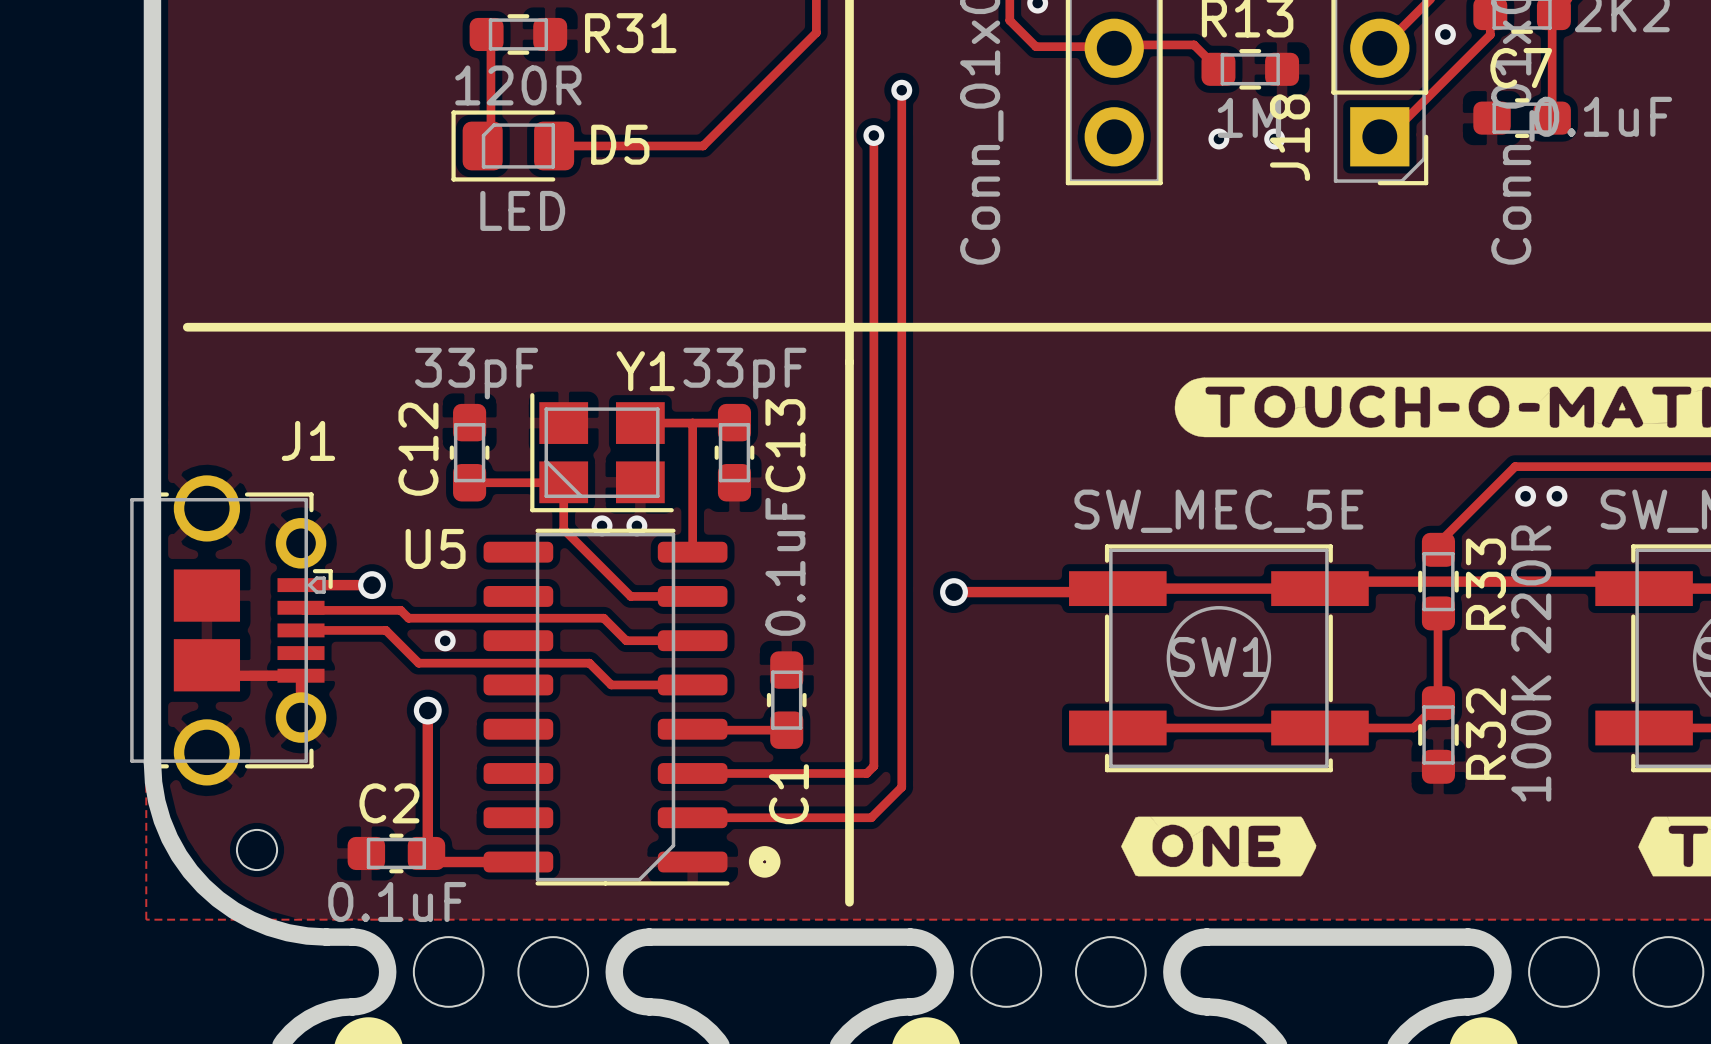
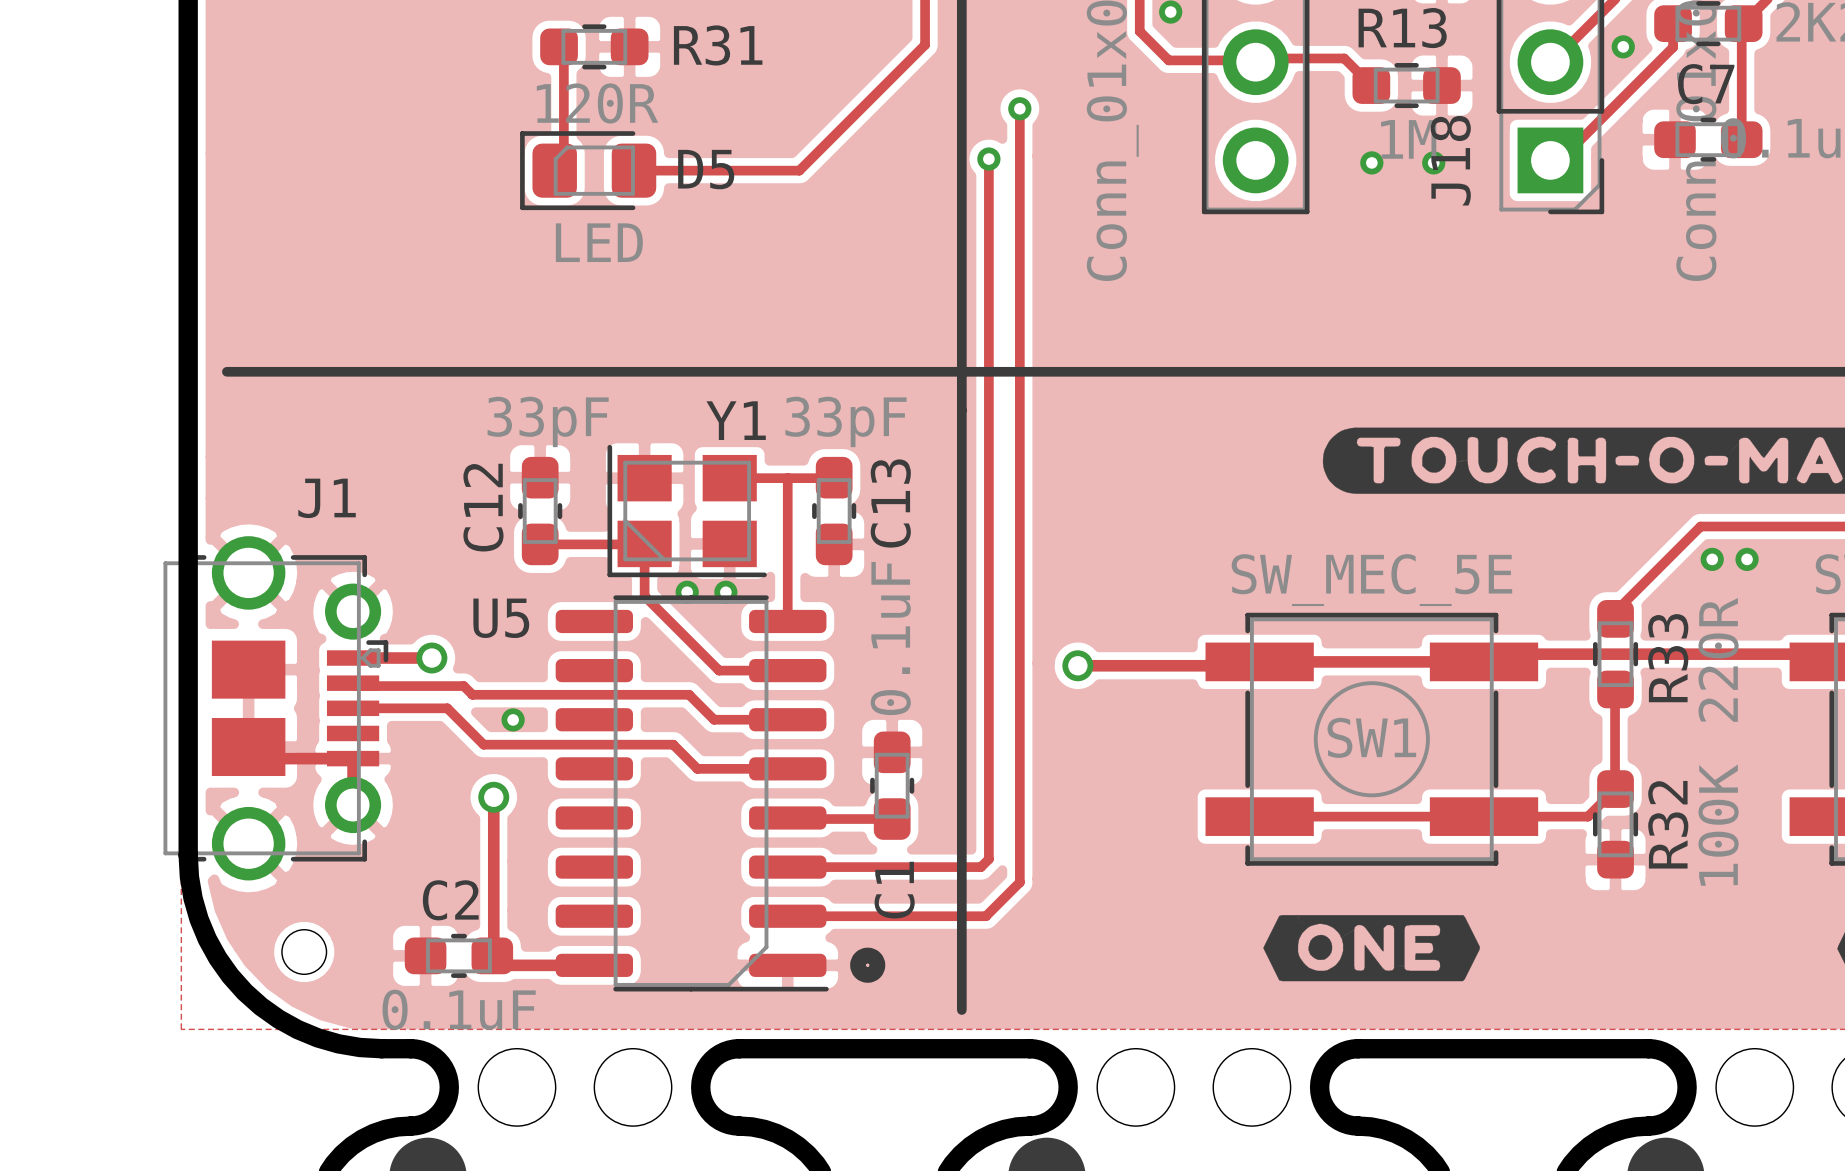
J1 name position: J1 (308, 440) -> J1 (327, 498)

